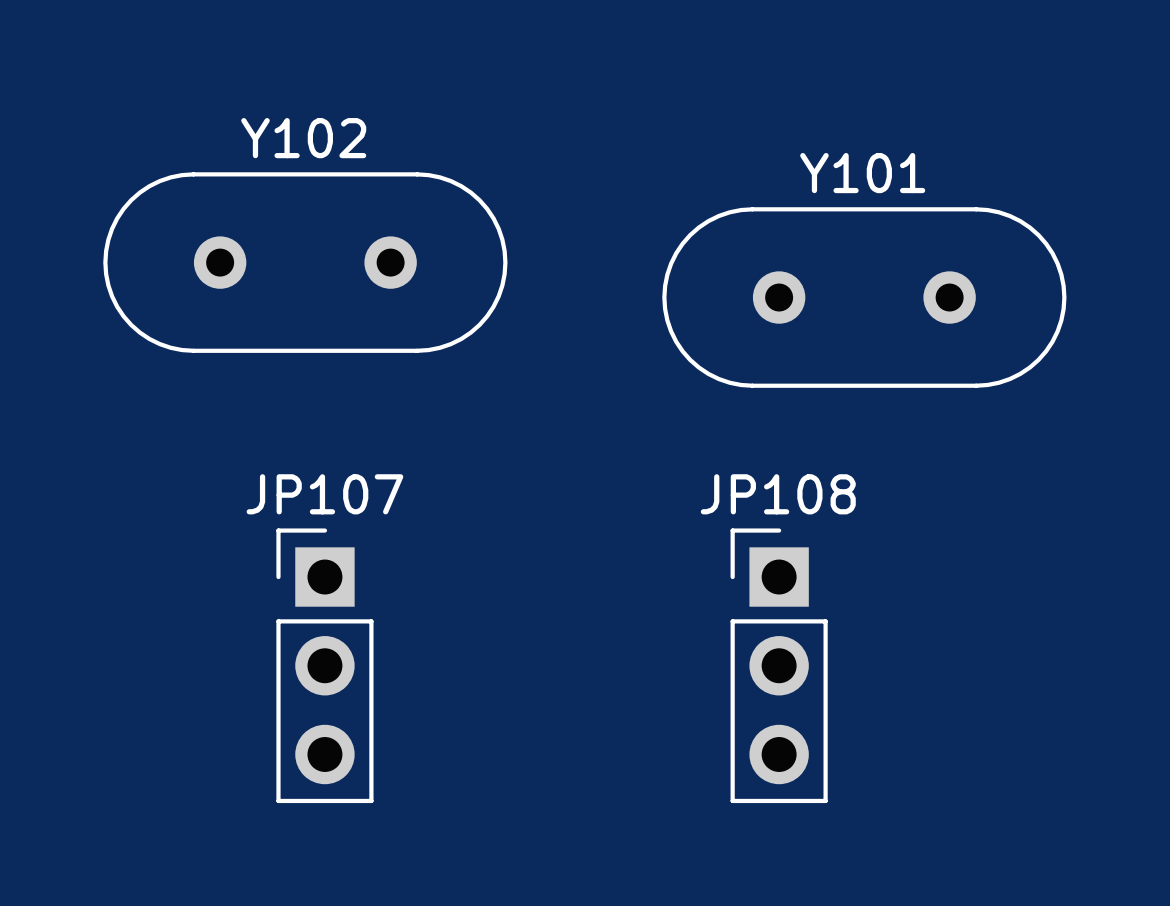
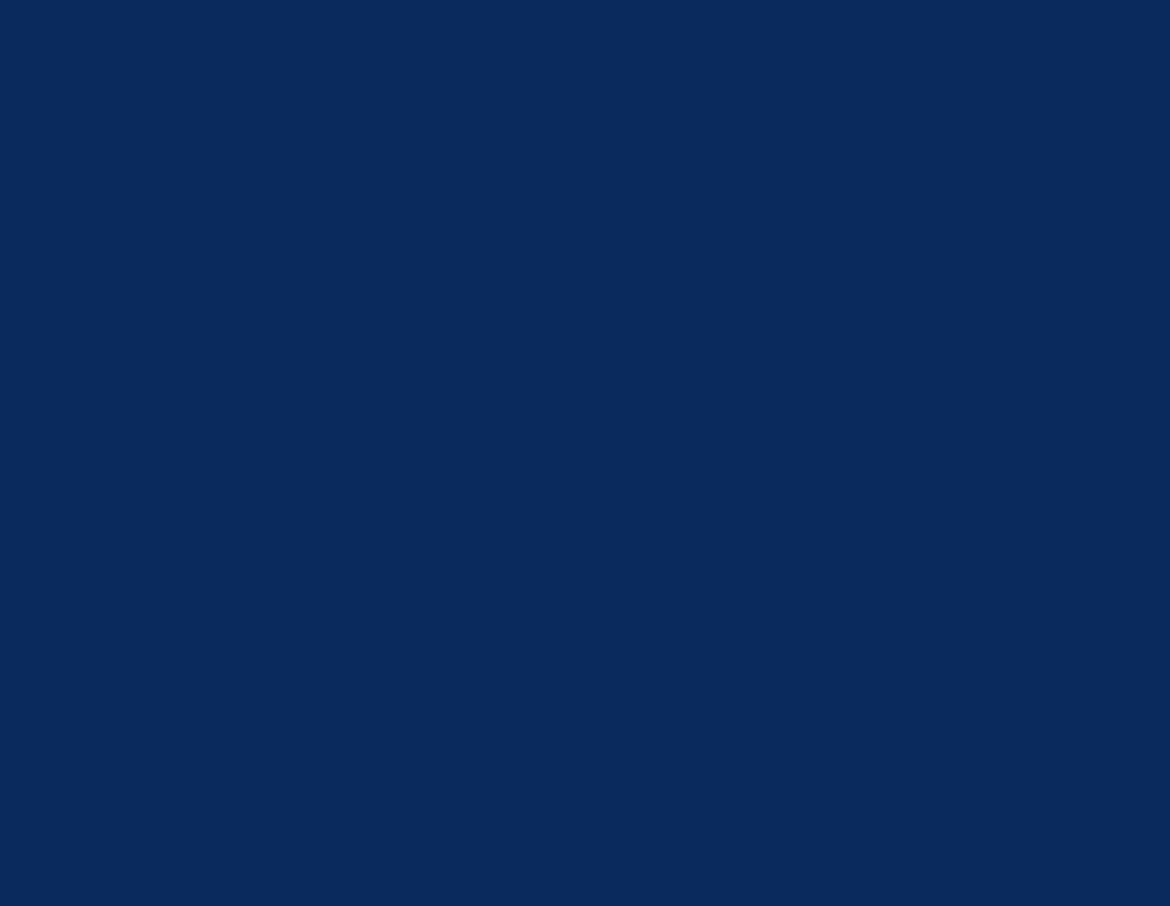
Y102: (305, 262) -> none
Y101: (864, 297) -> none
JP107: (324, 665) -> none
JP108: (779, 665) -> none

